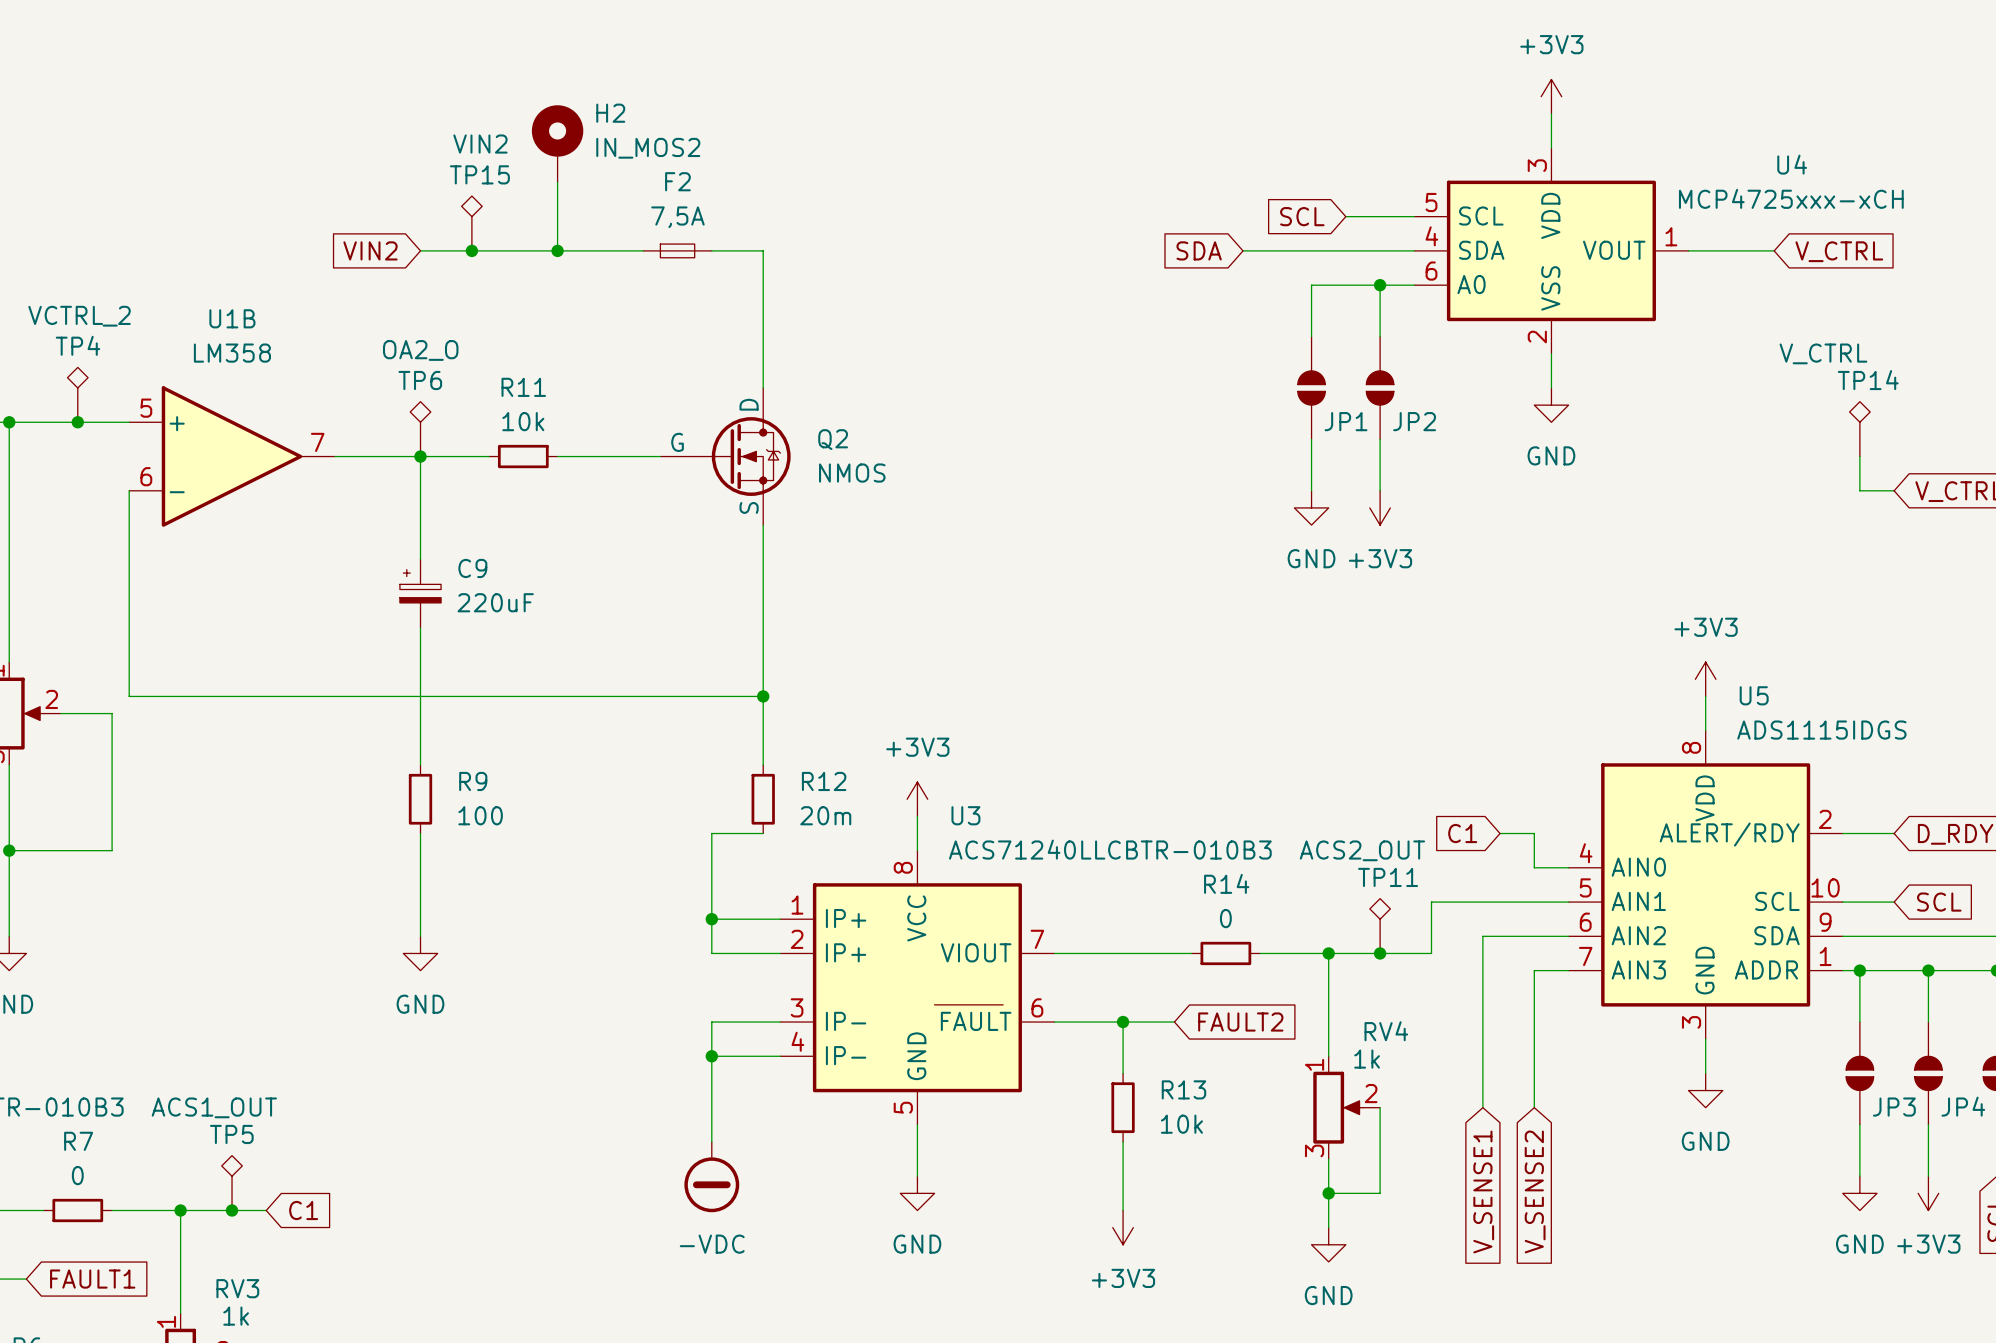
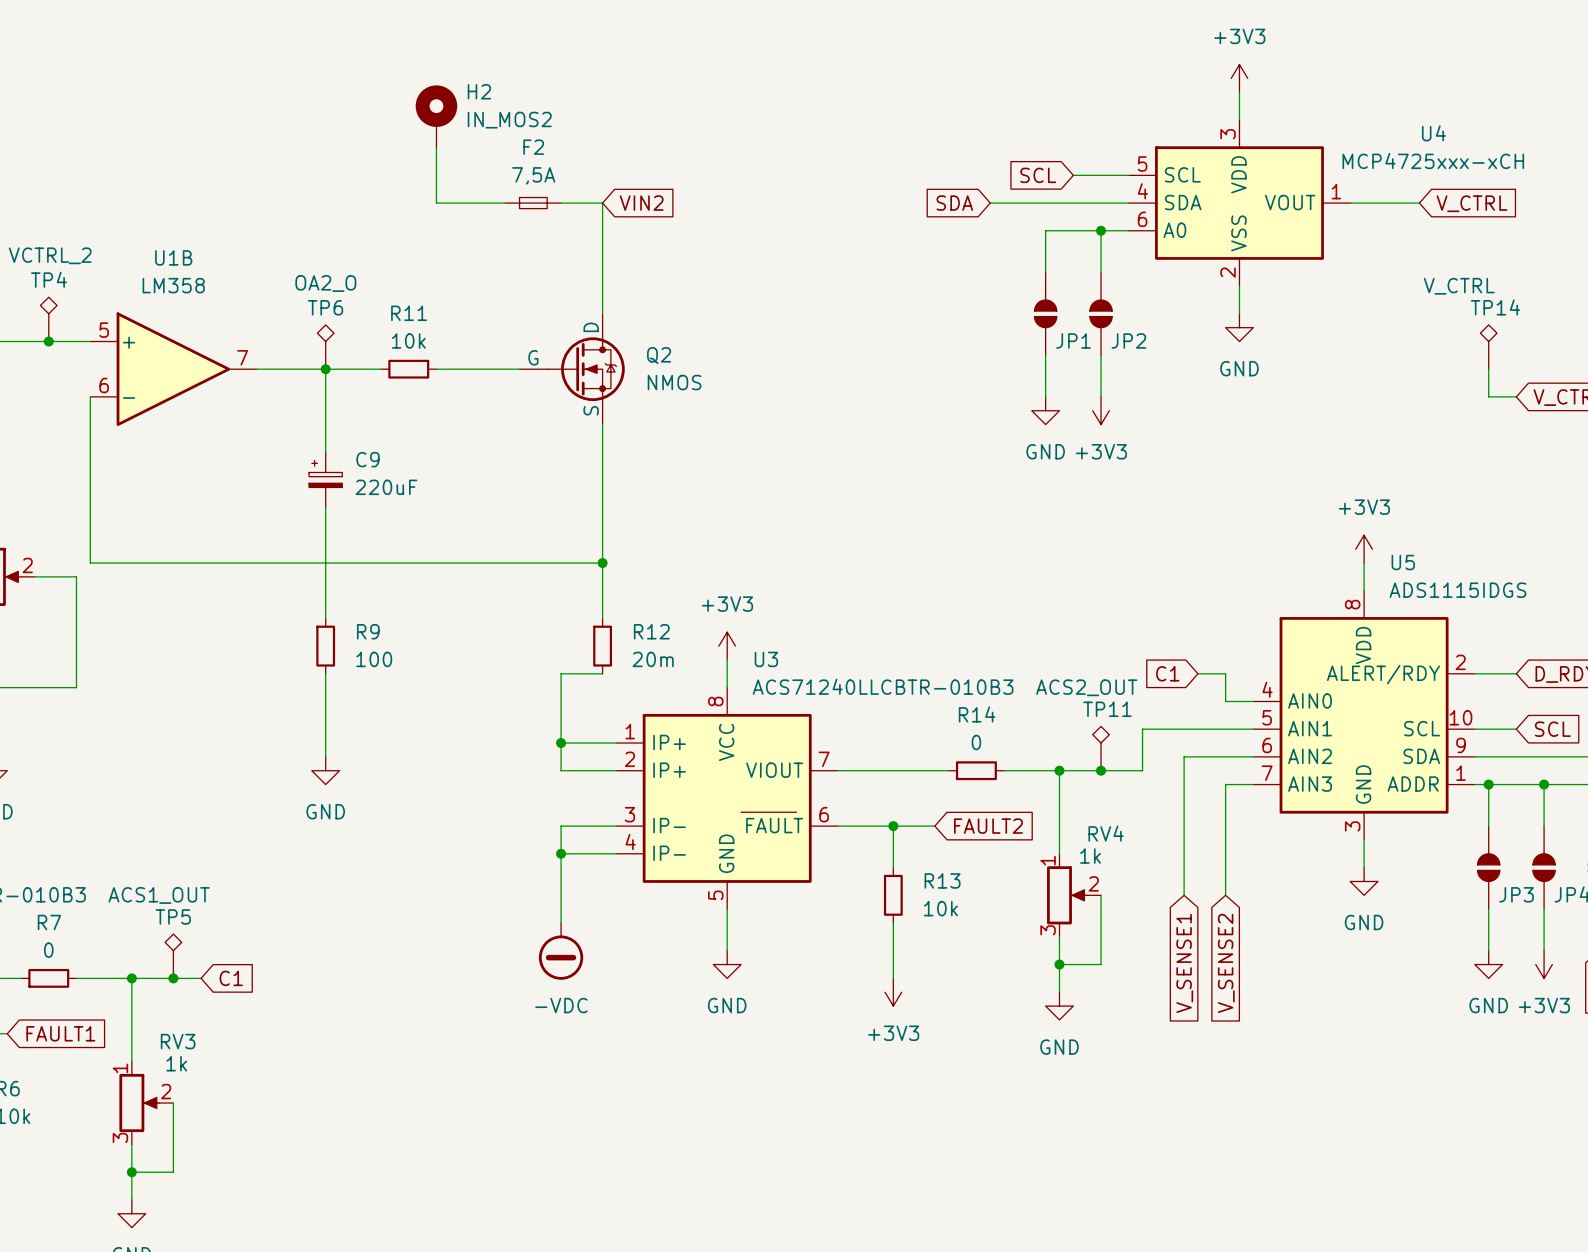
TP15: VIN2 (471, 223) -> none
global label: VIN2 (370, 250) -> none
wire: (420, 250) (557, 250) -> none
junction: (471, 250) -> none
junction: (557, 250) -> none
global label: none -> VIN2 (641, 203)

